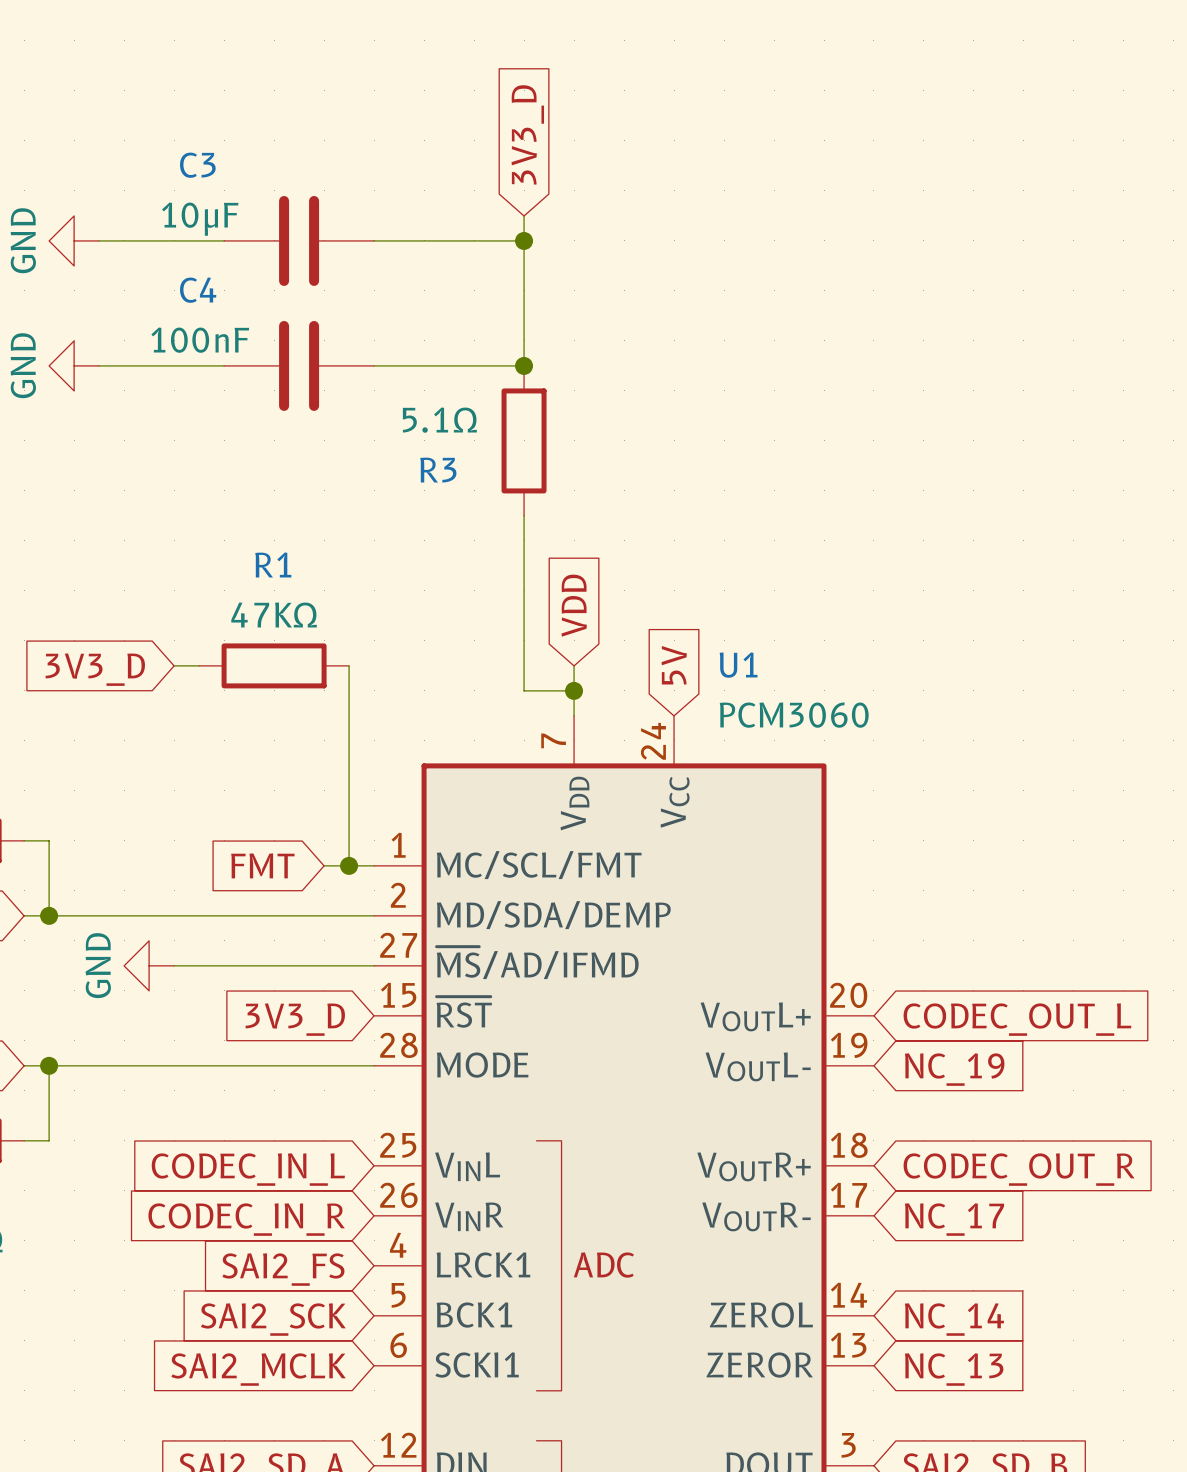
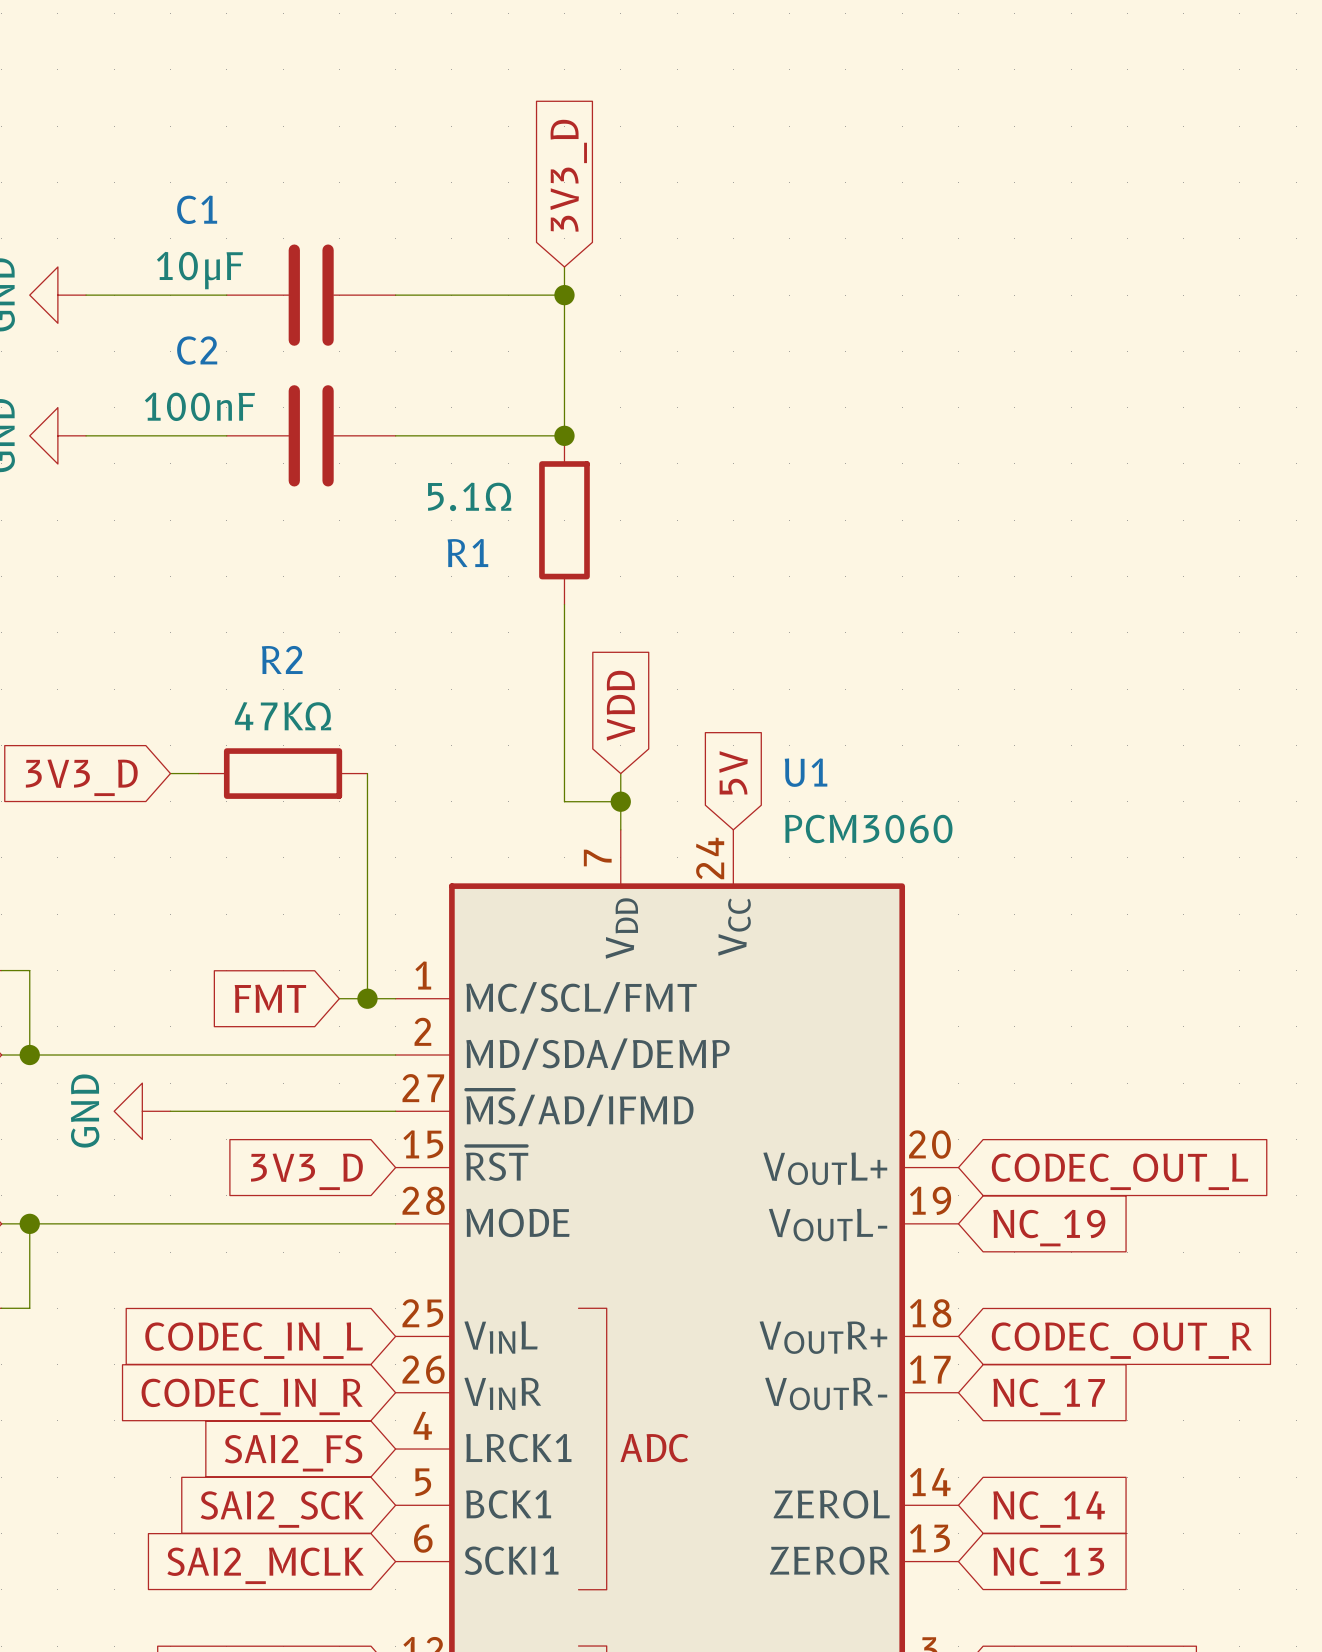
C3 name: C3 (197, 165) -> C1 (197, 209)
C4 name: C4 (198, 290) -> C2 (197, 350)
R3 name: R3 (438, 470) -> R1 (467, 552)
R1 name: R1 (273, 564) -> R2 (282, 659)

